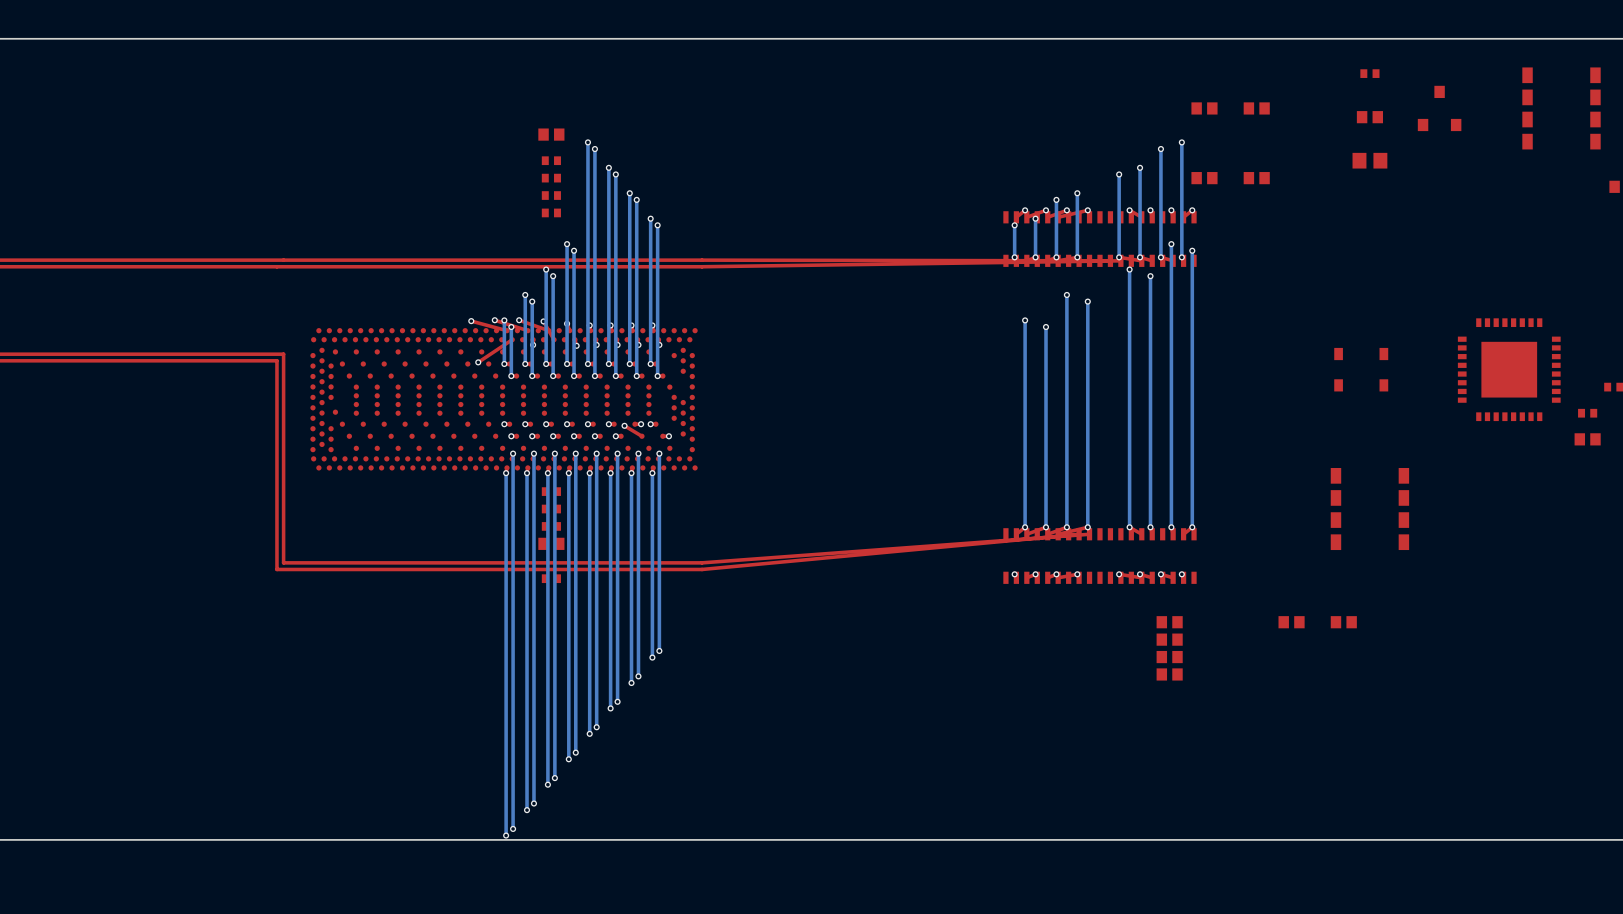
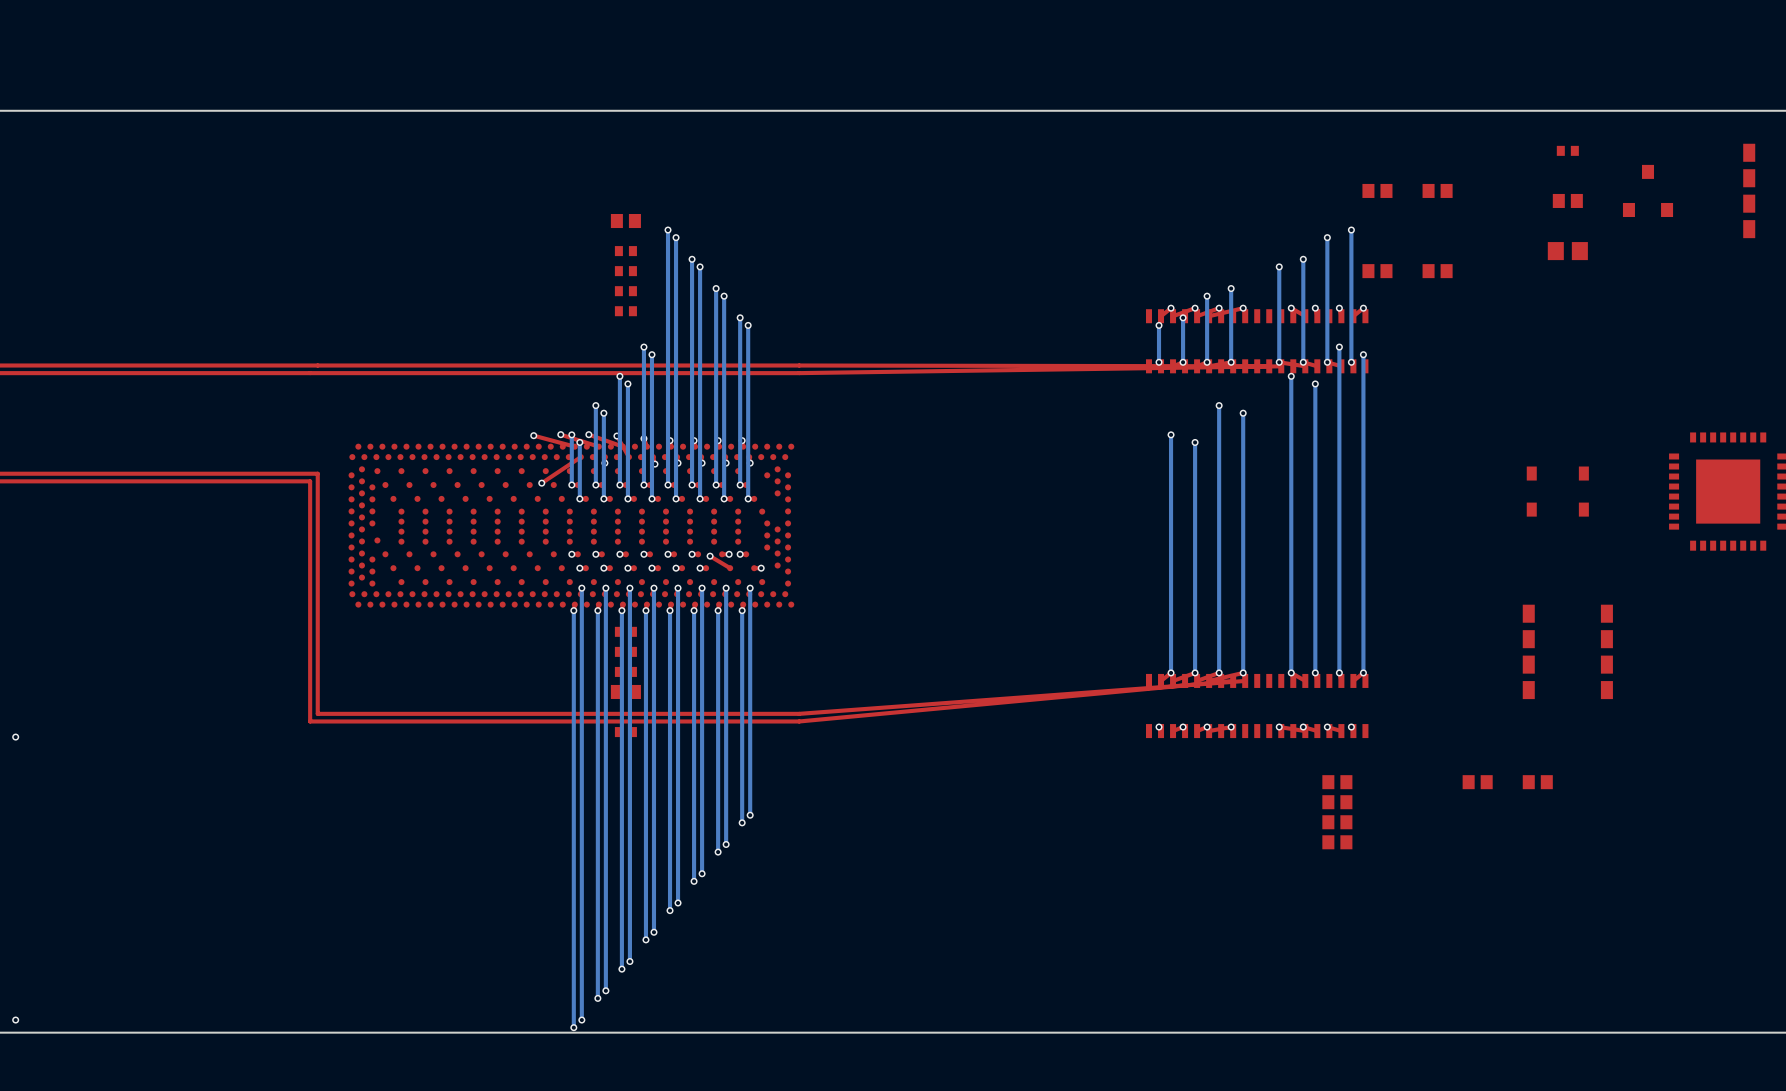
via: none -> (15, 737)
via: none -> (15, 1020)

